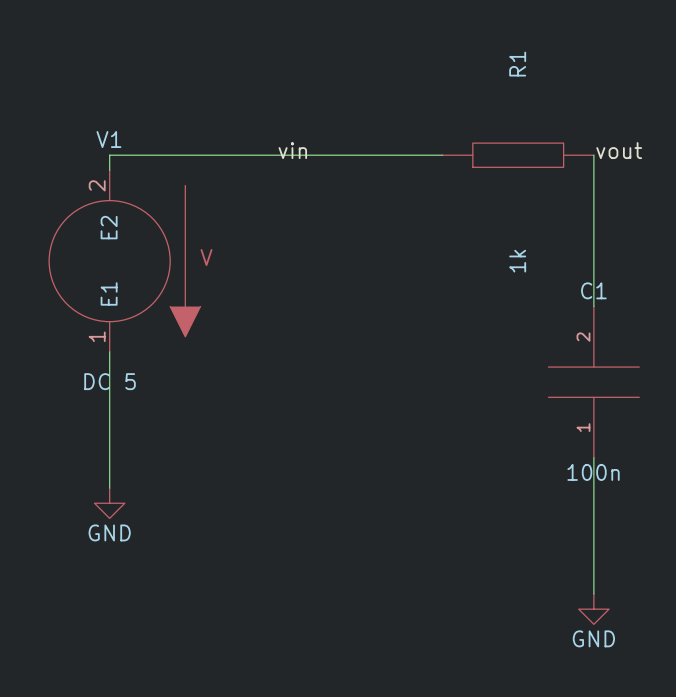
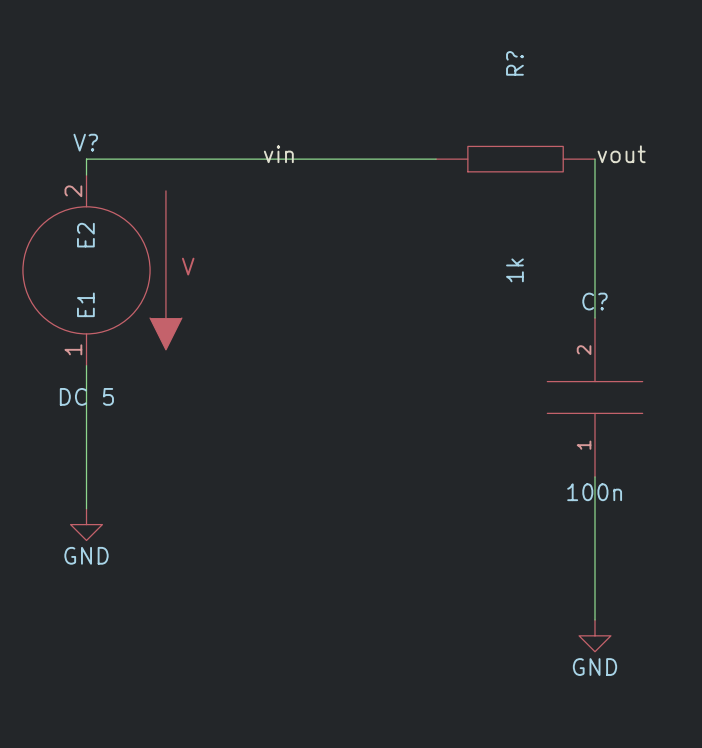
R1 name: R1 (517, 64) -> R? (514, 63)
V1 name: V1 (108, 139) -> V? (85, 142)
C1 name: C1 (593, 290) -> C? (594, 301)

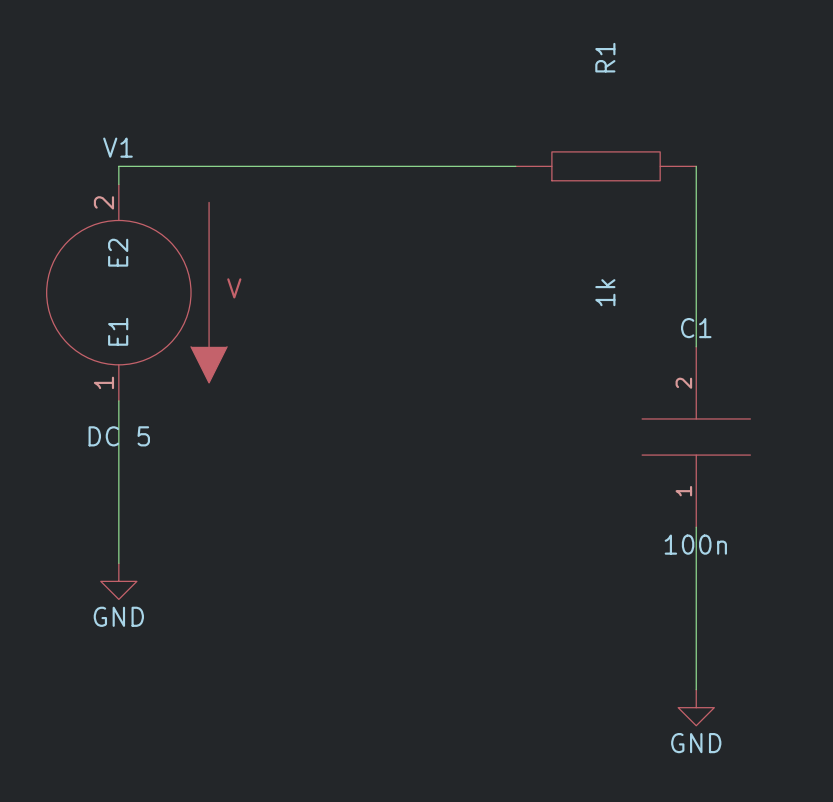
R? name: R? (514, 63) -> R1 (605, 57)
V? name: V? (85, 142) -> V1 (117, 147)
label: vin (278, 154) -> none
label: vout (621, 154) -> none
C? name: C? (594, 301) -> C1 (696, 328)

